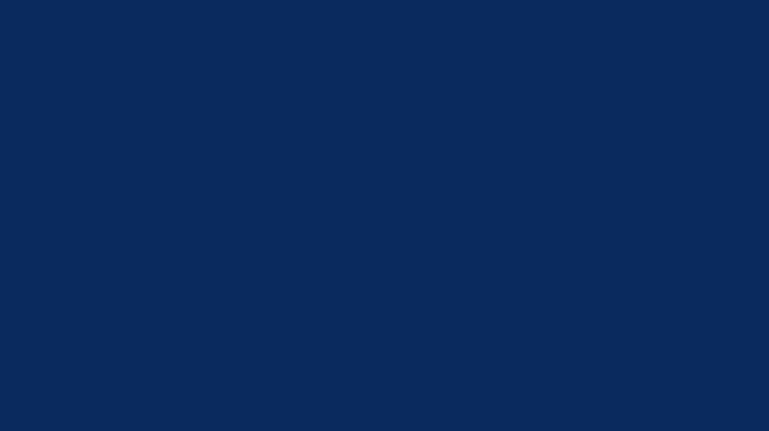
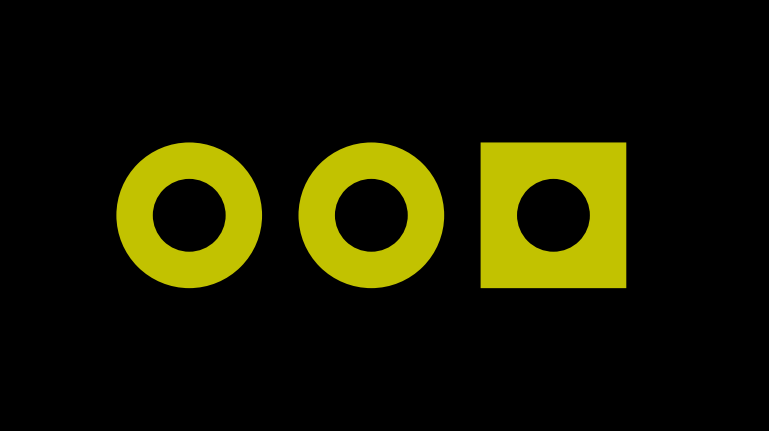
part: none -> (371, 215)

